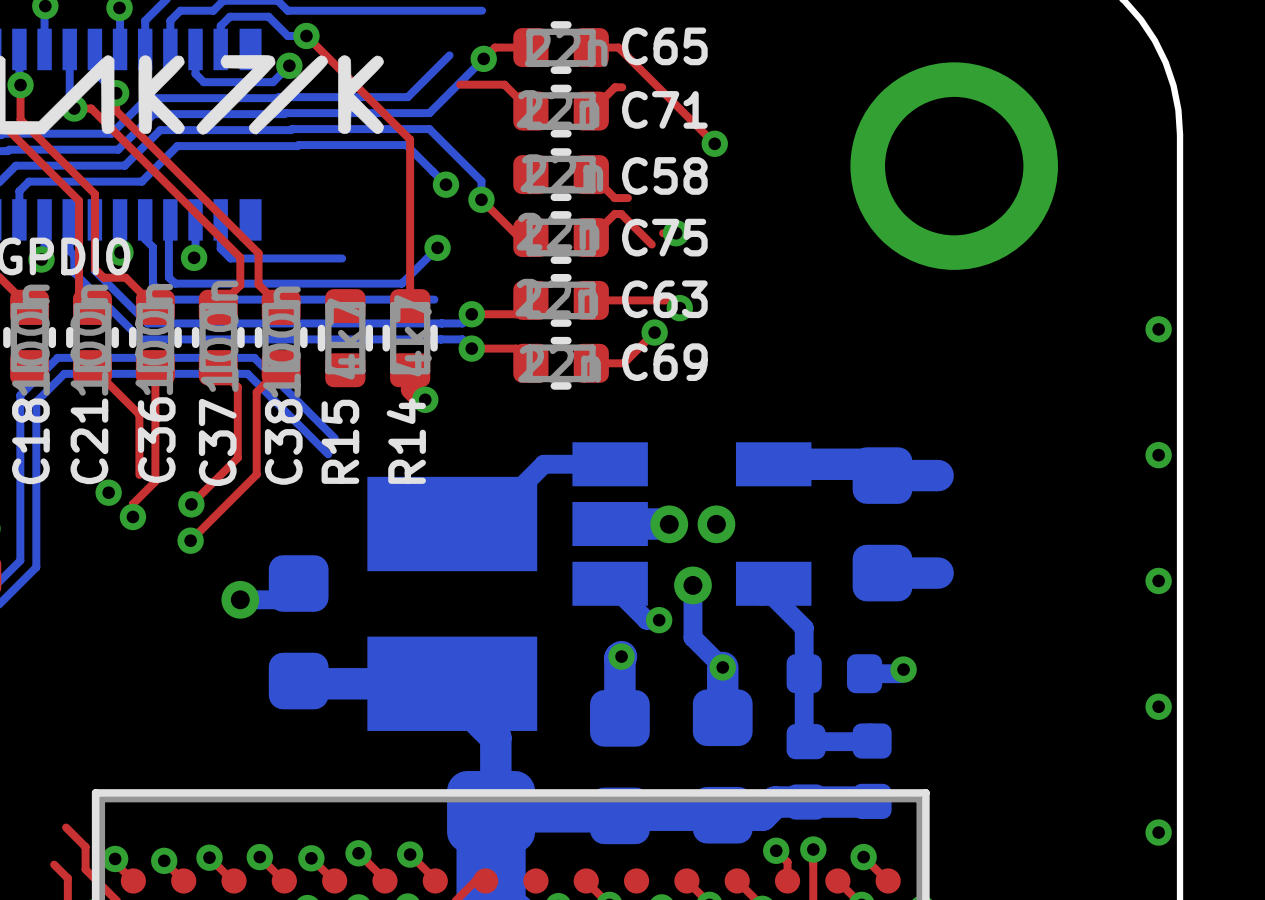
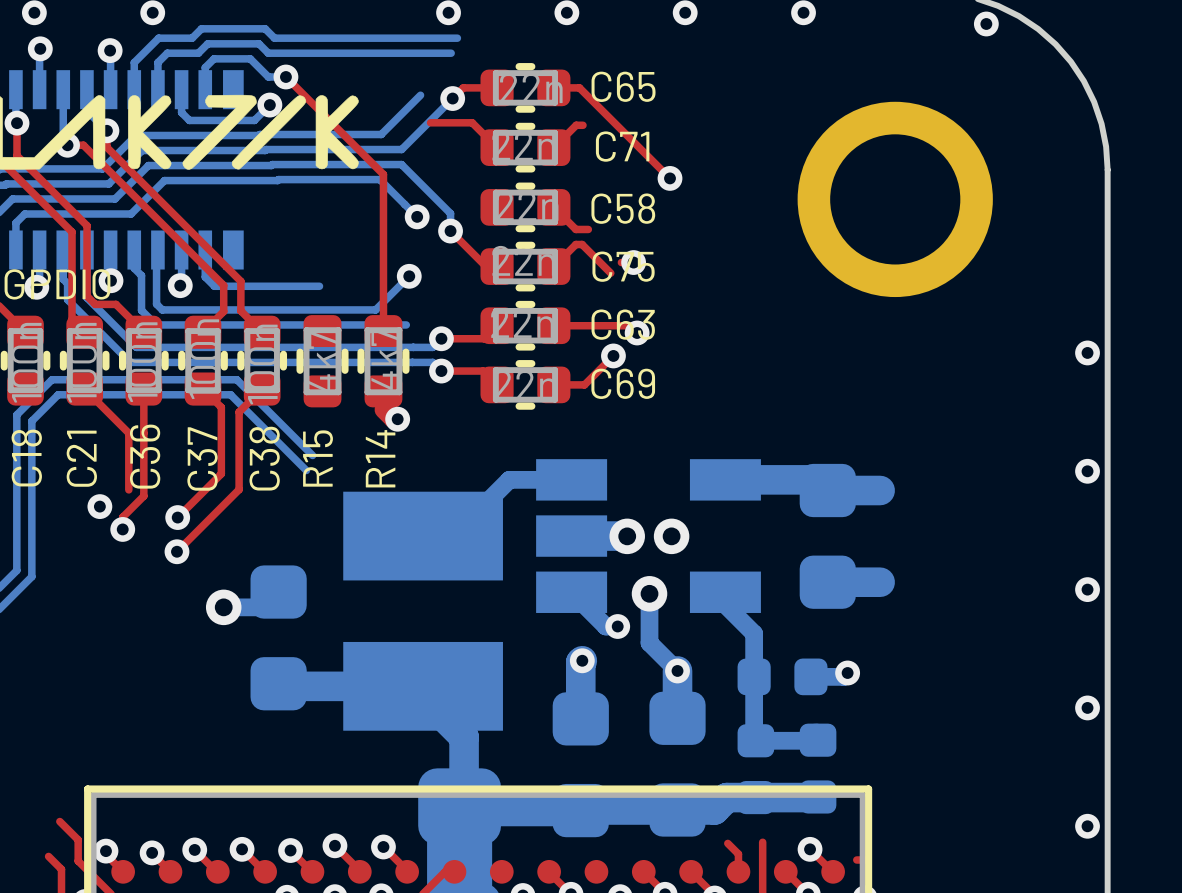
via: (813, 849) -> none
via: (776, 850) -> none
top track: none -> (856, 859) (864, 859)

